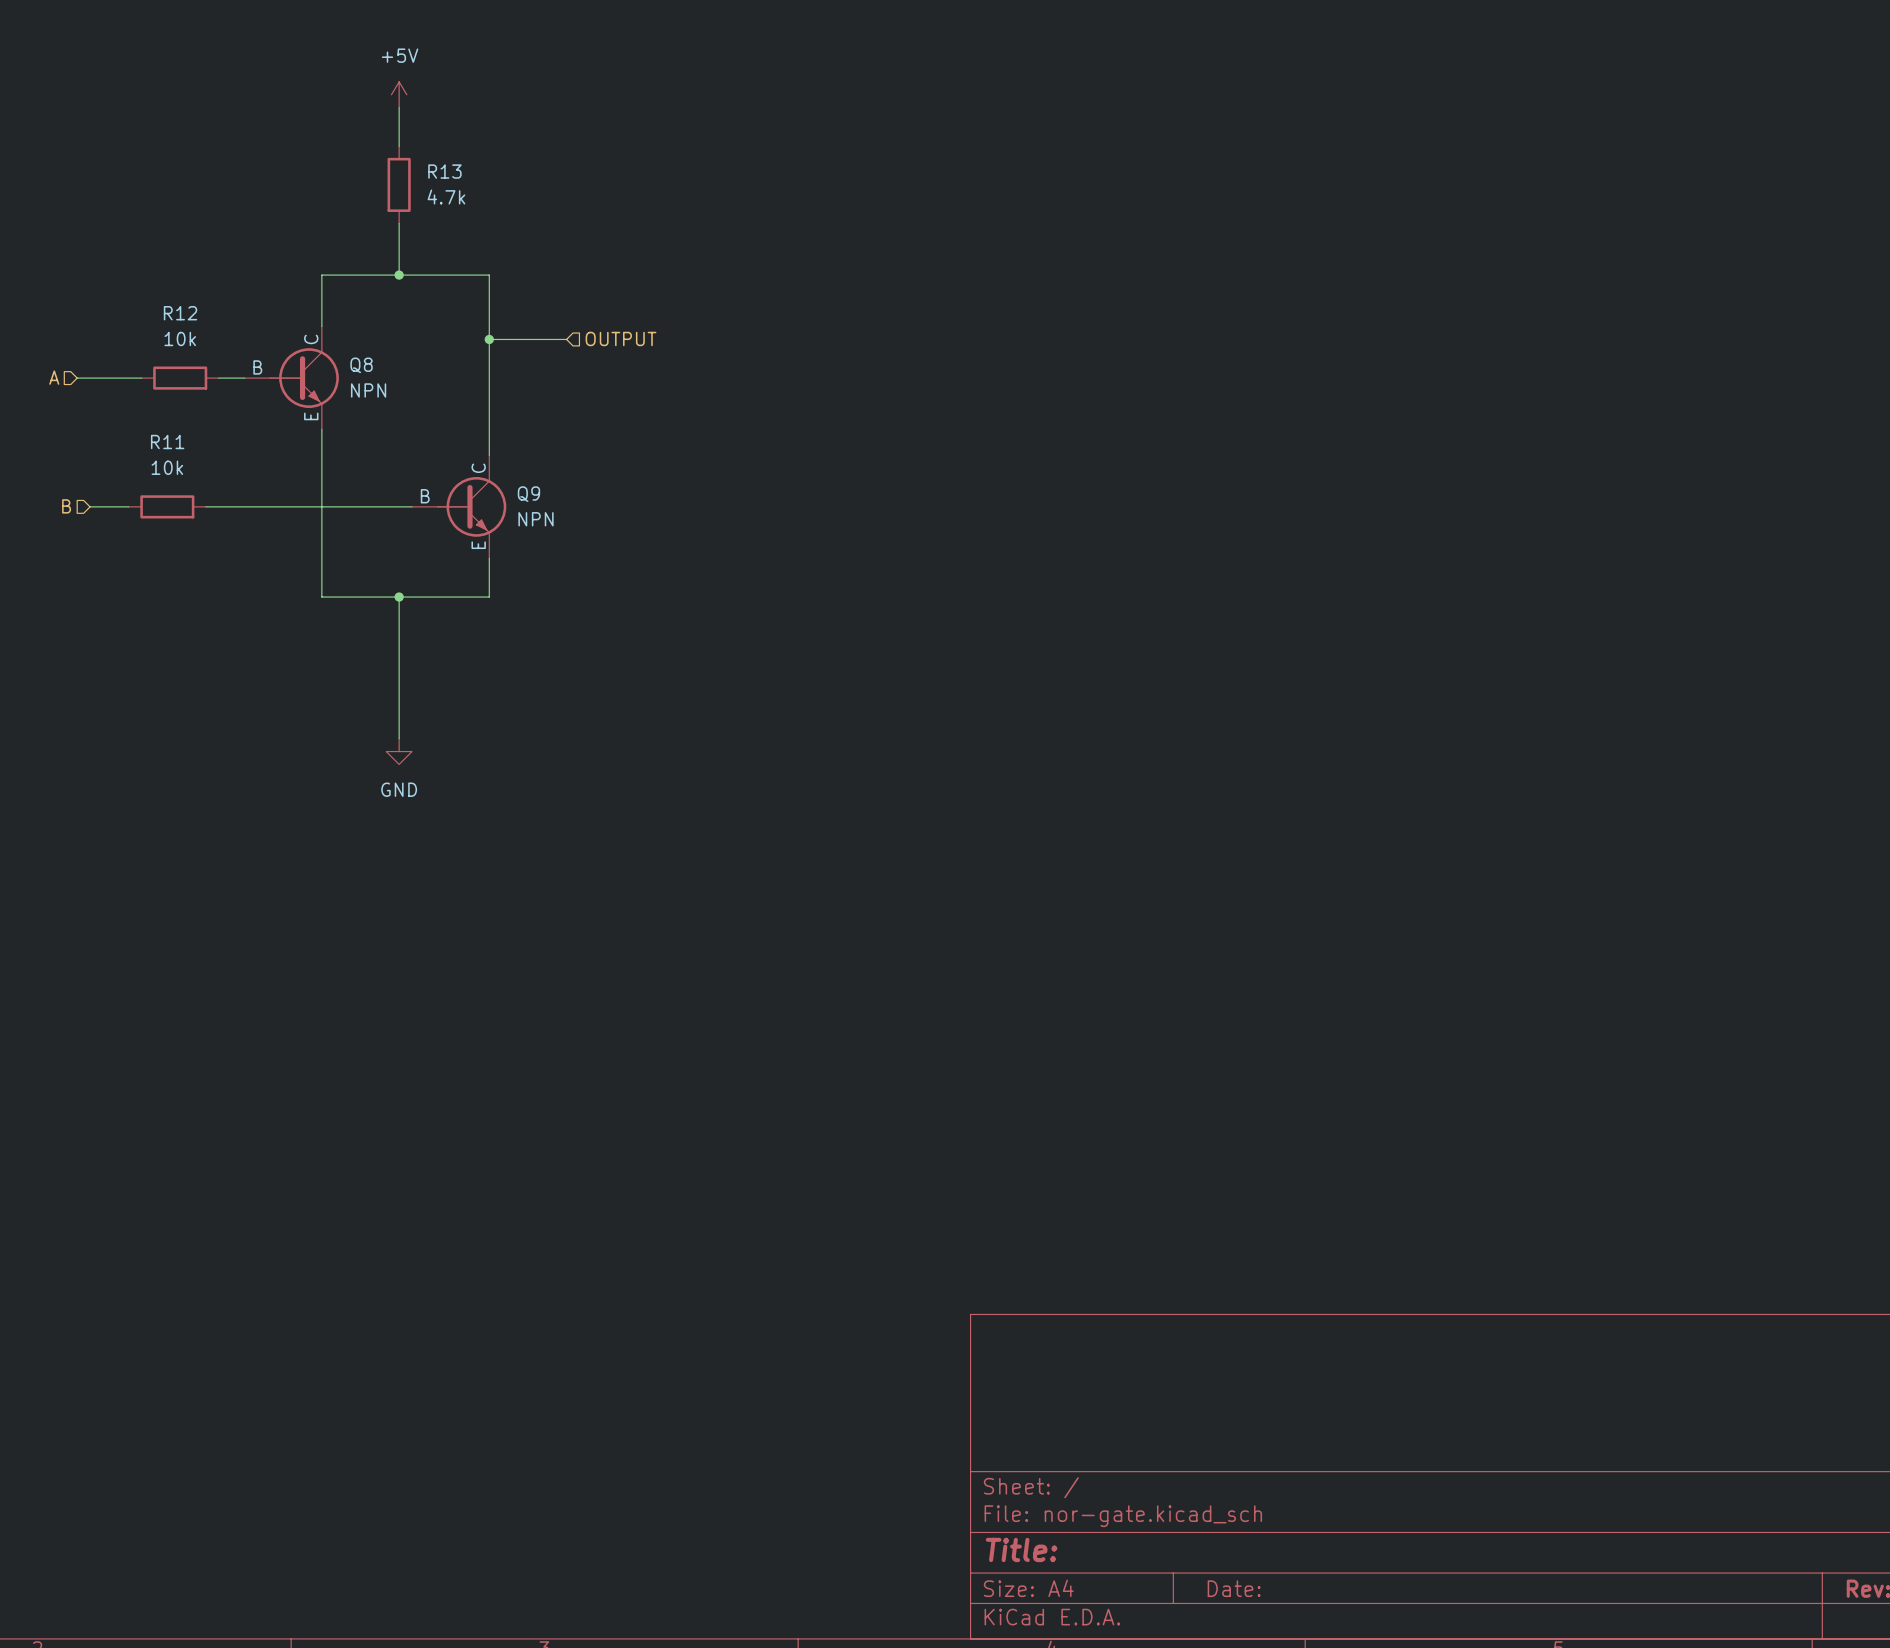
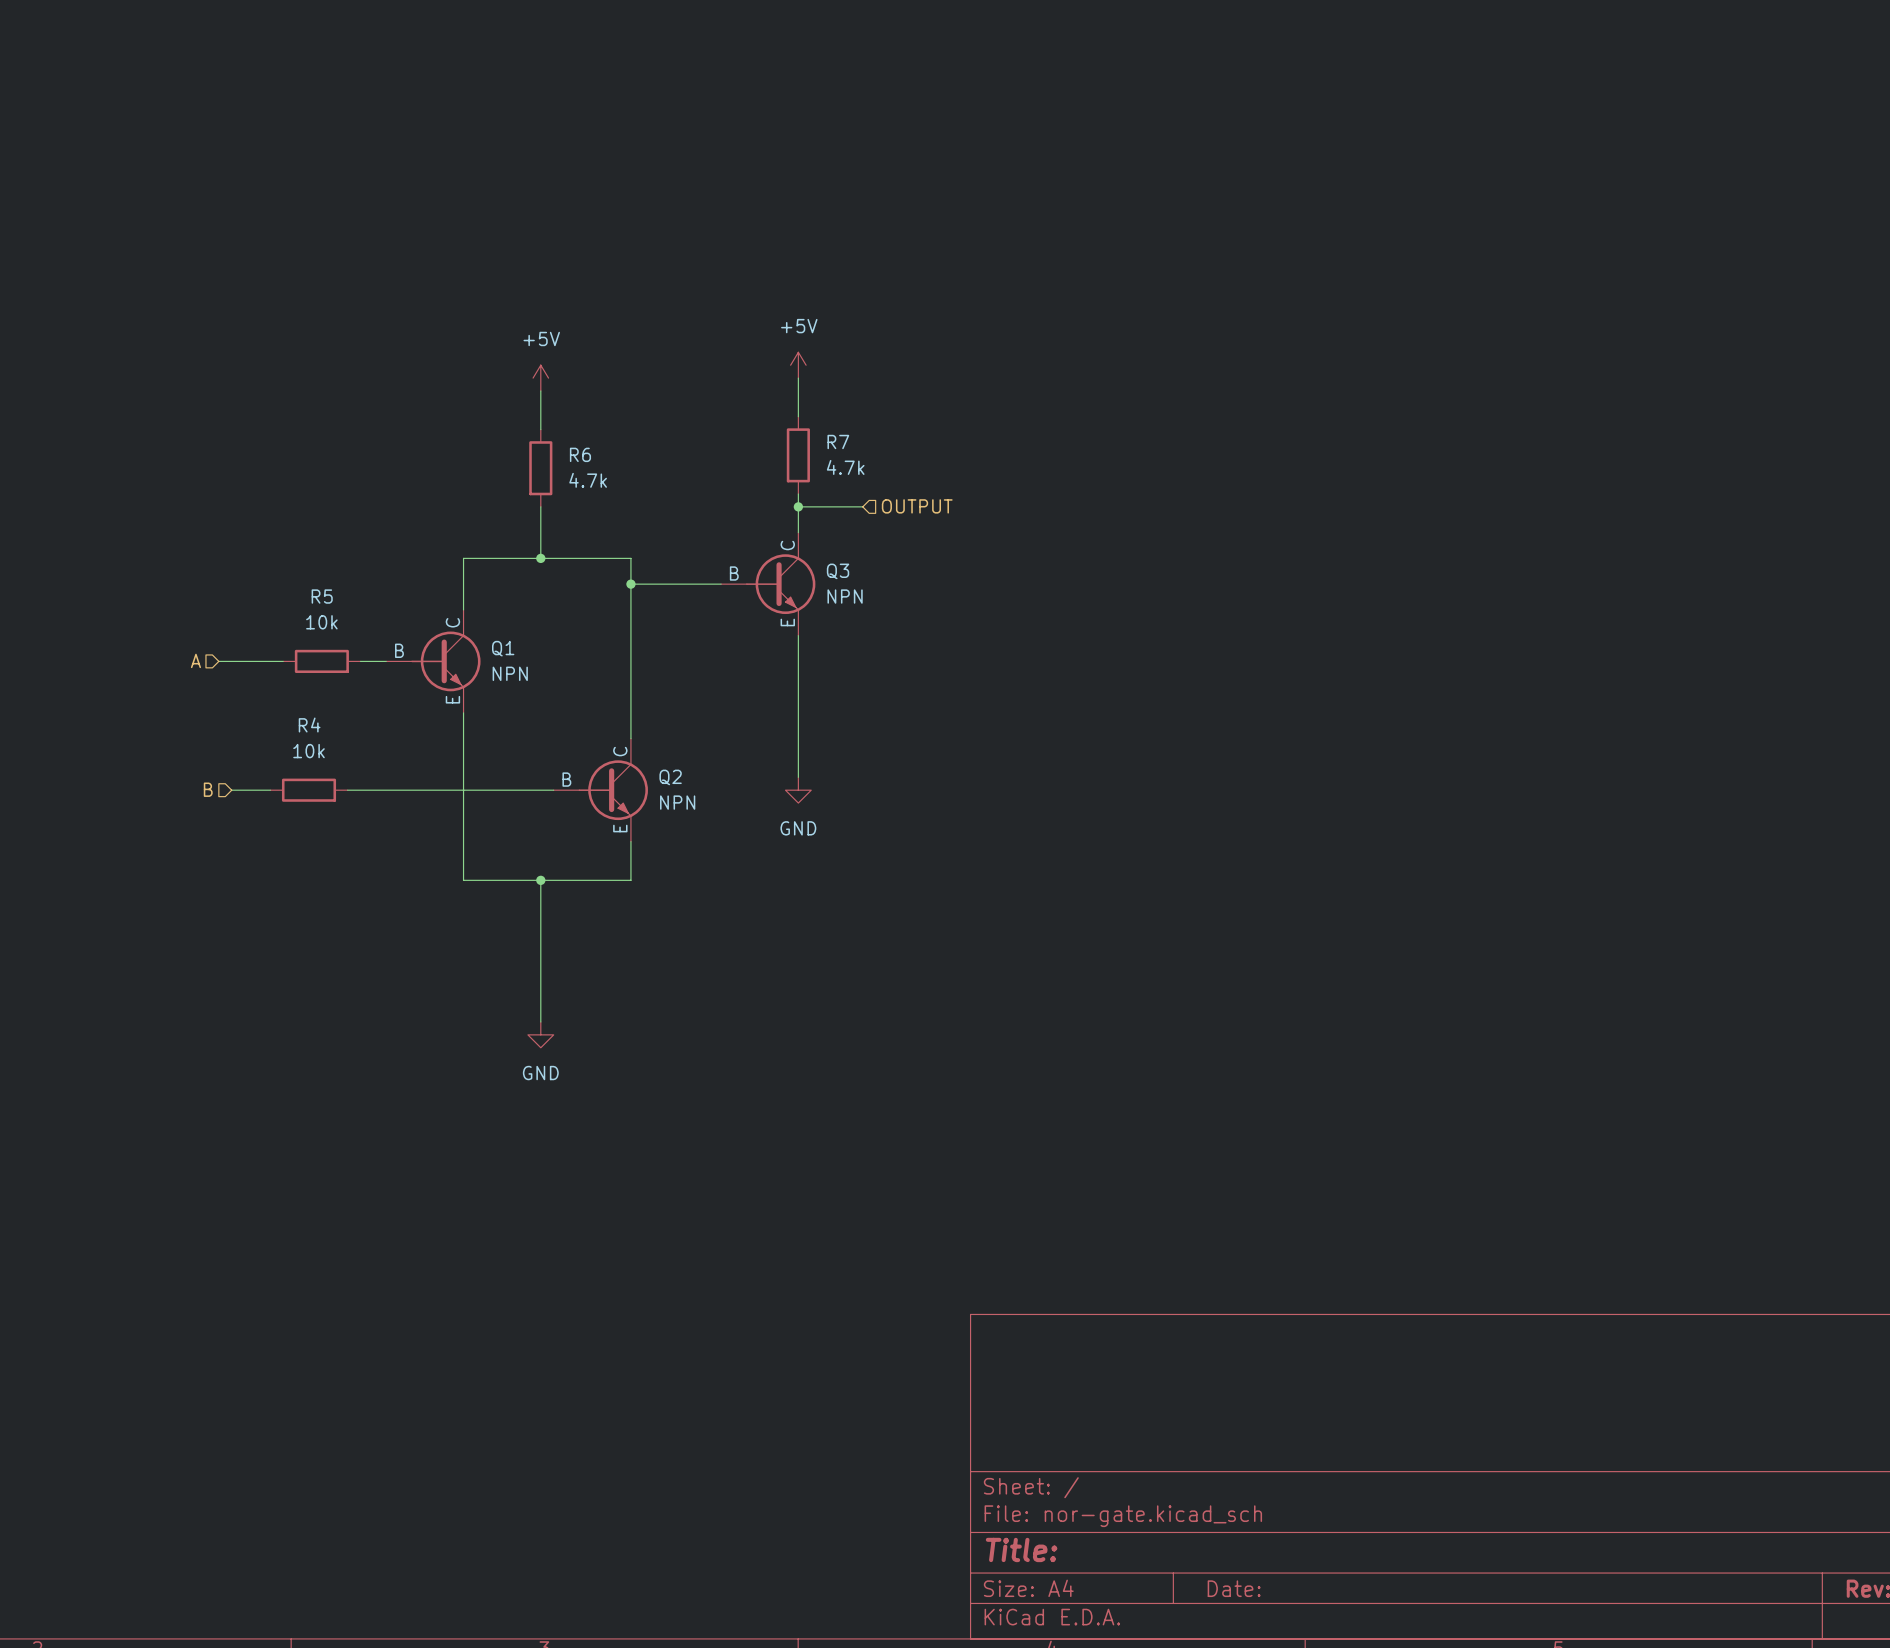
power symbol: +5V (399, 94) -> none
wire: (399, 107) (399, 146) -> none
R13: 4.7k (399, 184) -> none
wire: (399, 223) (399, 275) -> none
junction: (399, 275) -> none
wire: (321, 326) (321, 275) (489, 275) (489, 455) -> none
hierarchical label: OUTPUT (621, 338) -> none
wire: (489, 339) (566, 339) -> none
junction: (489, 339) -> none
power symbol: none -> +5V (798, 365)
hierarchical label: A (54, 377) -> none
wire: (77, 378) (141, 378) -> none
R12: 10k (180, 378) -> none
wire: (218, 378) (244, 378) -> none
Q8: NPN (291, 378) -> none
power symbol: none -> +5V (540, 378)
wire: none -> (798, 378) (798, 416)
wire: none -> (540, 390) (540, 429)
wire: (321, 429) (321, 597) (489, 597) (489, 558) -> none
R7: none -> 4.7k (798, 455)
R6: none -> 4.7k (540, 468)
wire: none -> (798, 493) (798, 532)
hierarchical label: B (66, 506) -> none
wire: (90, 506) (128, 506) -> none
R11: 10k (167, 506) -> none
wire: (205, 506) (412, 506) -> none
Q9: NPN (459, 506) -> none
wire: none -> (540, 506) (540, 558)
wire: none -> (798, 506) (862, 506)
junction: none -> (798, 506)
hierarchical label: none -> OUTPUT (917, 506)
junction: none -> (540, 558)
wire: none -> (630, 584) (721, 584)
junction: none -> (630, 584)
Q3: none -> NPN (768, 584)
wire: (399, 597) (399, 738) -> none
junction: (399, 597) -> none
wire: none -> (463, 609) (463, 558) (630, 558) (630, 738)
wire: none -> (798, 635) (798, 777)
hierarchical label: none -> A (195, 660)
wire: none -> (218, 661) (283, 661)
R5: none -> 10k (321, 661)
wire: none -> (360, 661) (386, 661)
Q1: none -> NPN (433, 661)
wire: none -> (463, 712) (463, 880) (630, 880) (630, 841)
power symbol: GND (399, 751) -> none
hierarchical label: none -> B (208, 789)
wire: none -> (231, 790) (270, 790)
R4: none -> 10k (309, 790)
wire: none -> (347, 790) (553, 790)
Q2: none -> NPN (600, 790)
power symbol: none -> GND (798, 790)
wire: none -> (540, 880) (540, 1022)
junction: none -> (540, 880)
power symbol: none -> GND (540, 1034)

